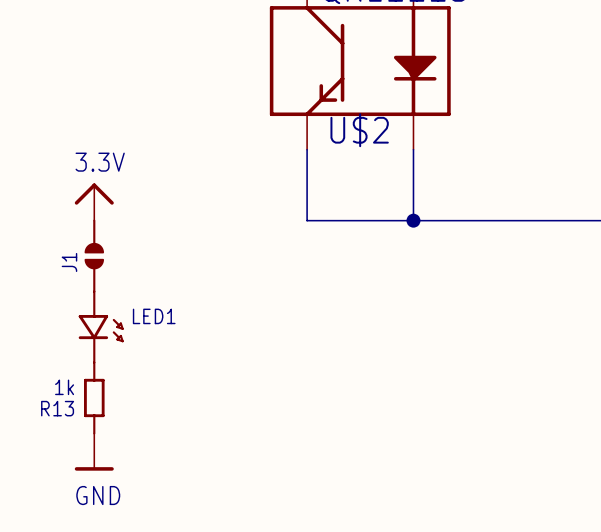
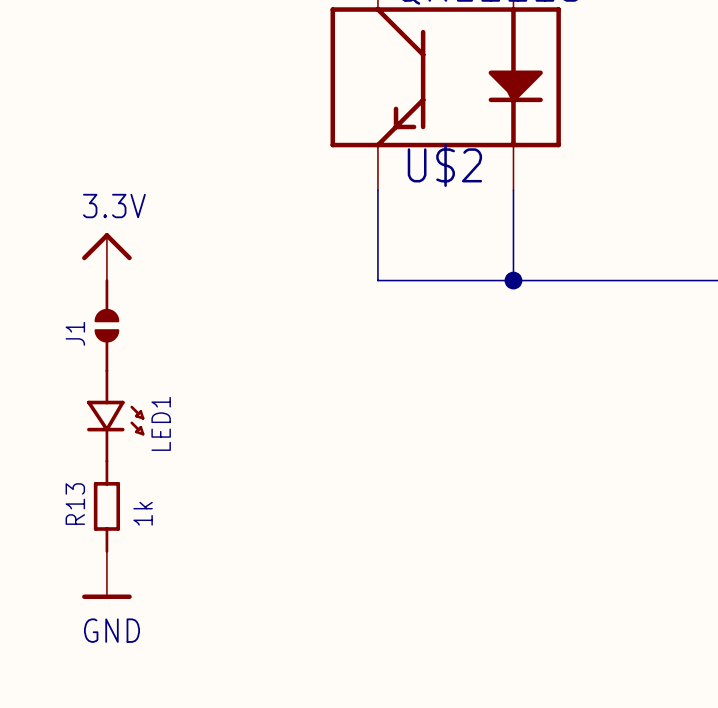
LED1 name rotation: 0° (154, 316) -> 90° counterclockwise (161, 423)
R13 value rotation: 0° (64, 387) -> 90° counterclockwise (143, 513)
R13 value position: 1k (64, 387) -> 1k (143, 513)
R13 name rotation: 0° (57, 408) -> 90° counterclockwise (75, 504)

